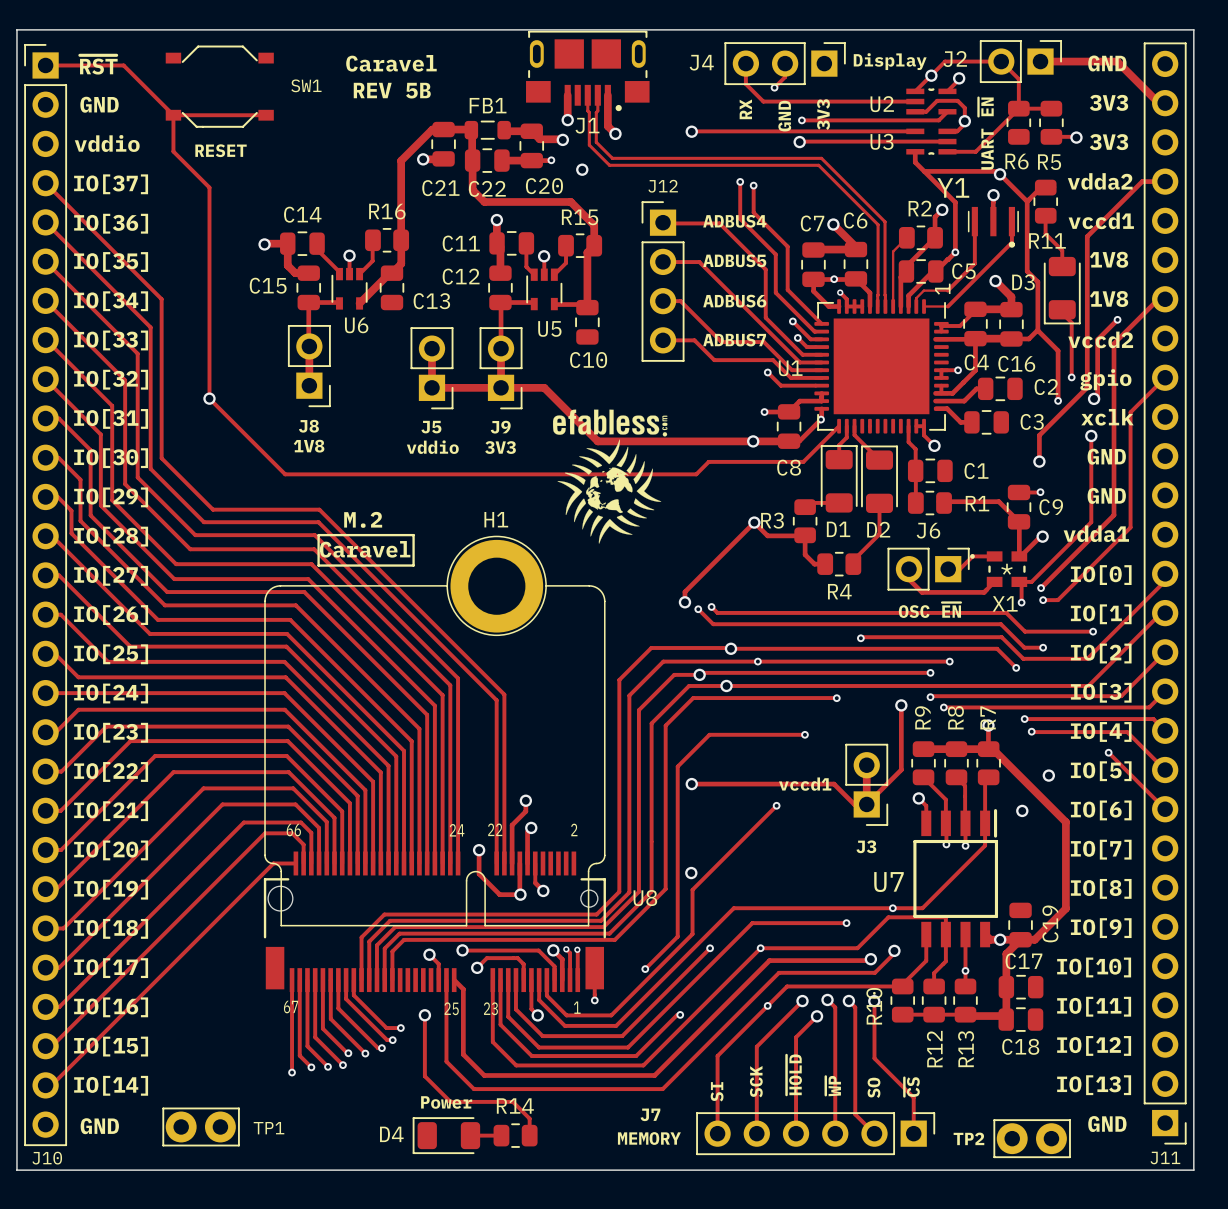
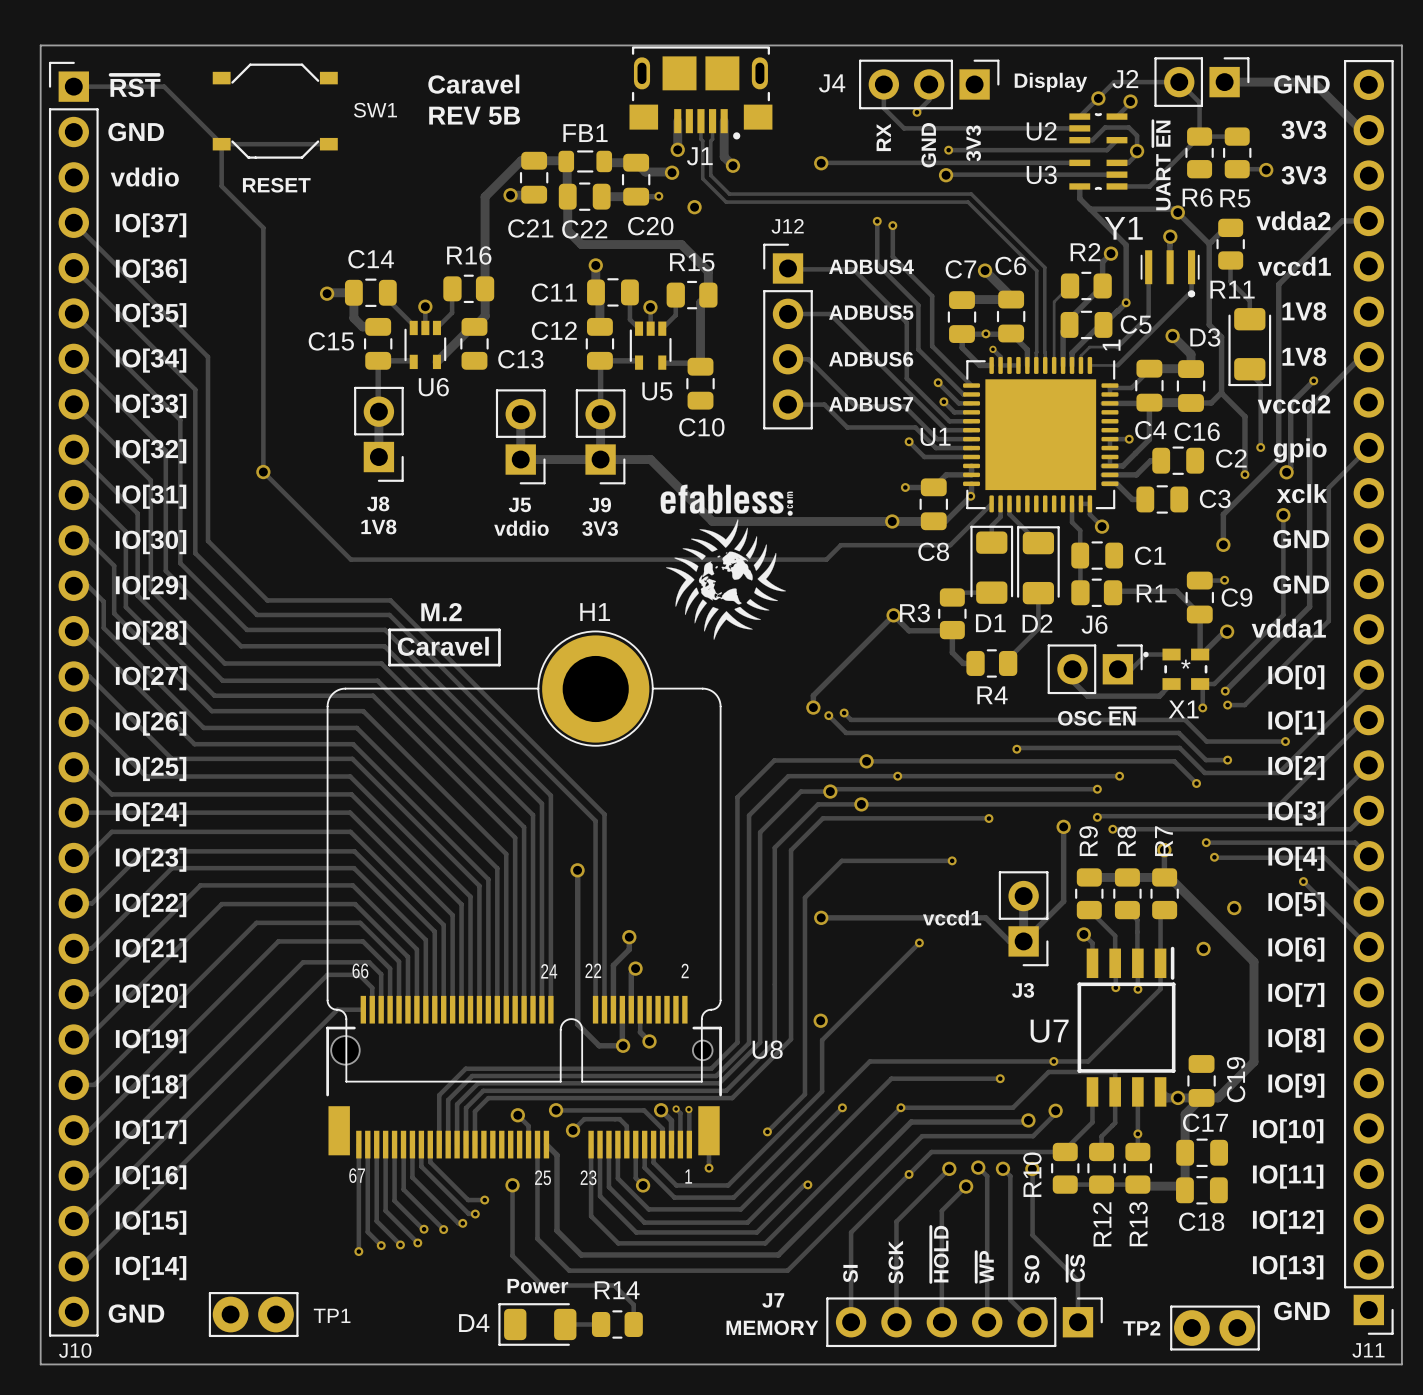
via: none -> (577, 870)
track: (479, 850) (479, 873) (481, 876) -> (577, 870) (577, 1024)
via: (479, 850) -> none

